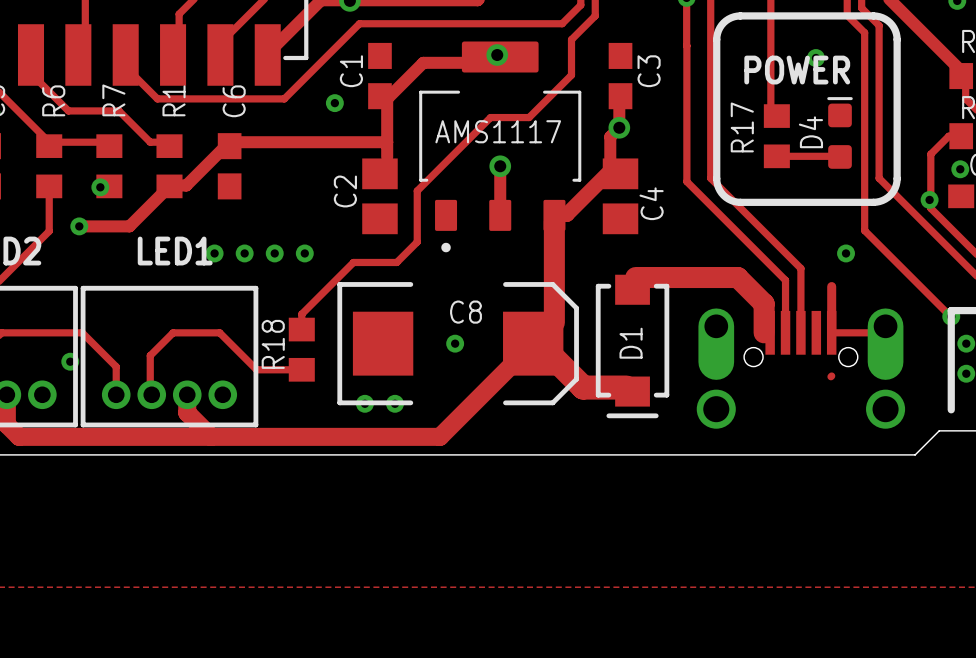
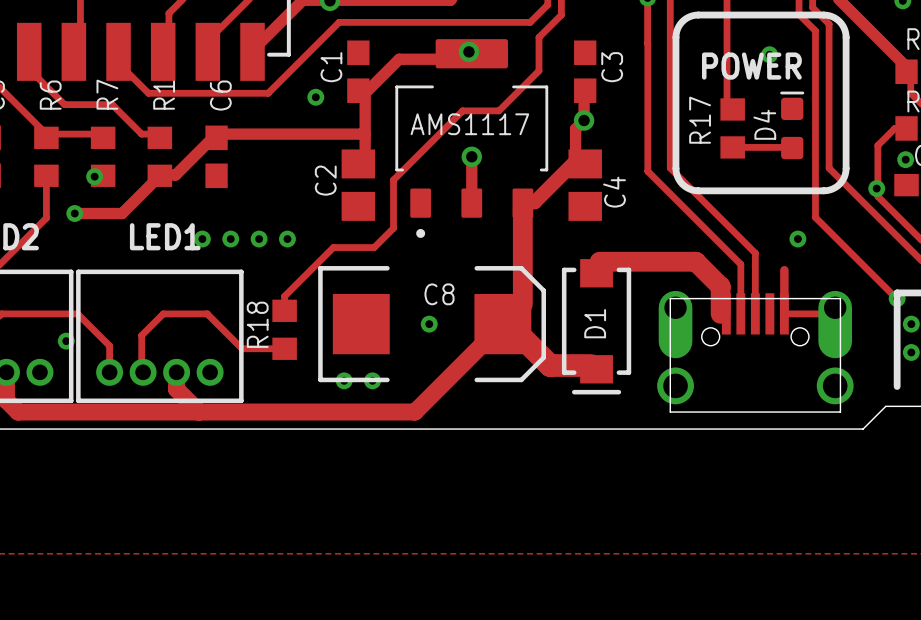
board edge: none -> (670, 298) (840, 298) (840, 412) (670, 412) (670, 298)
track: (831, 376) (830, 376) -> none

